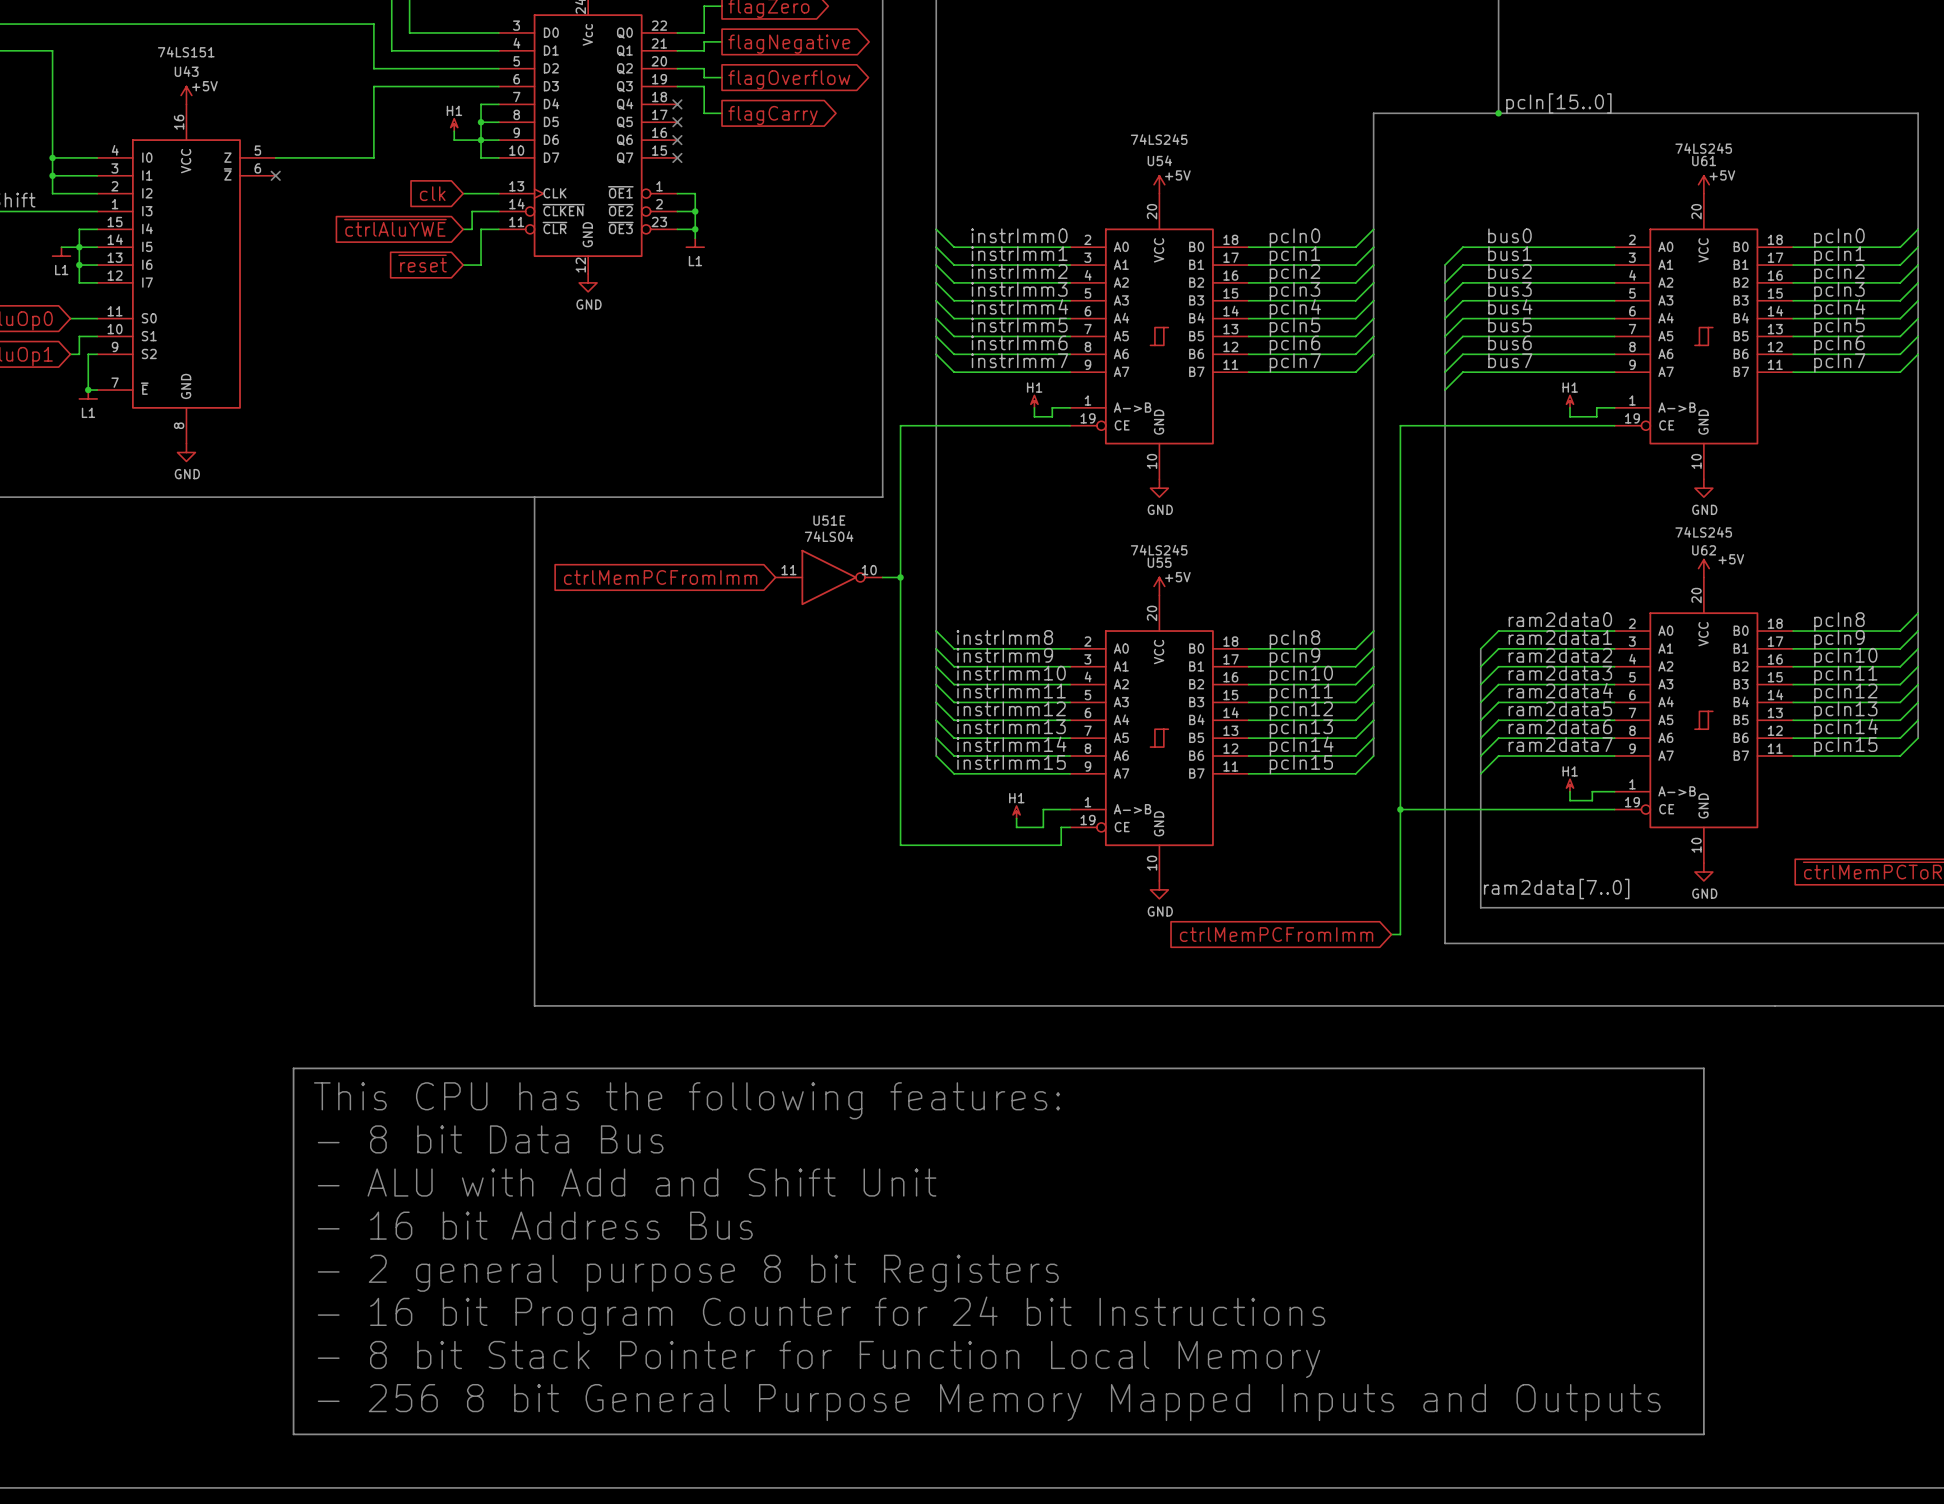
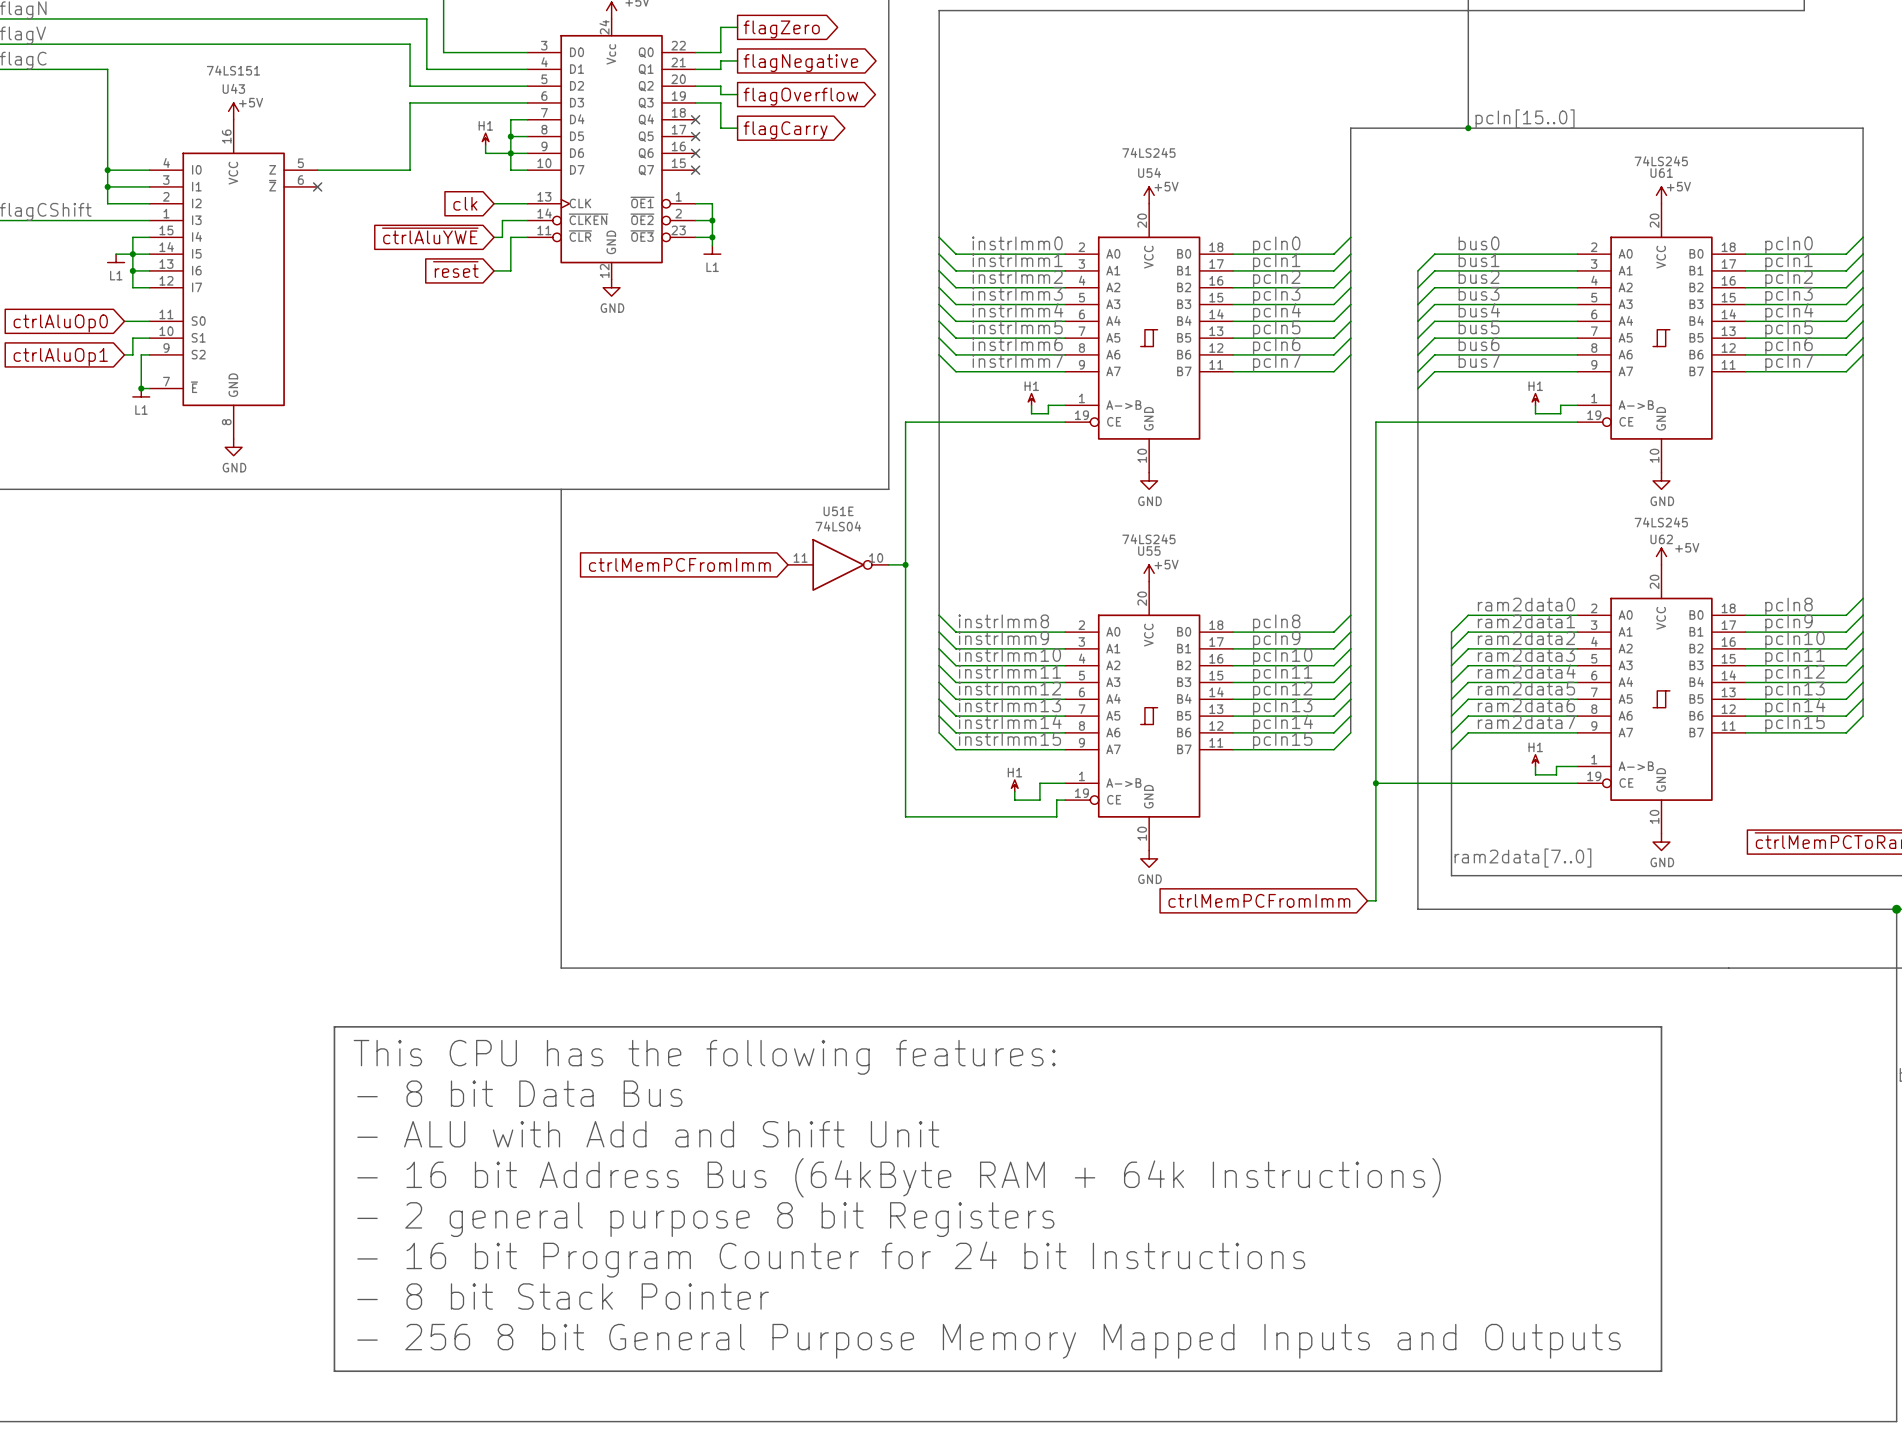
text: - 16 bit Address Bus (535, 1225) -> - 16 bit Address Bus (64kByte RAM + 64k Instructions) (899, 1177)
text: - 8 bit Stack Pointer for Function Local Memory (819, 1359) -> - 8 bit Stack Pointer (563, 1296)

